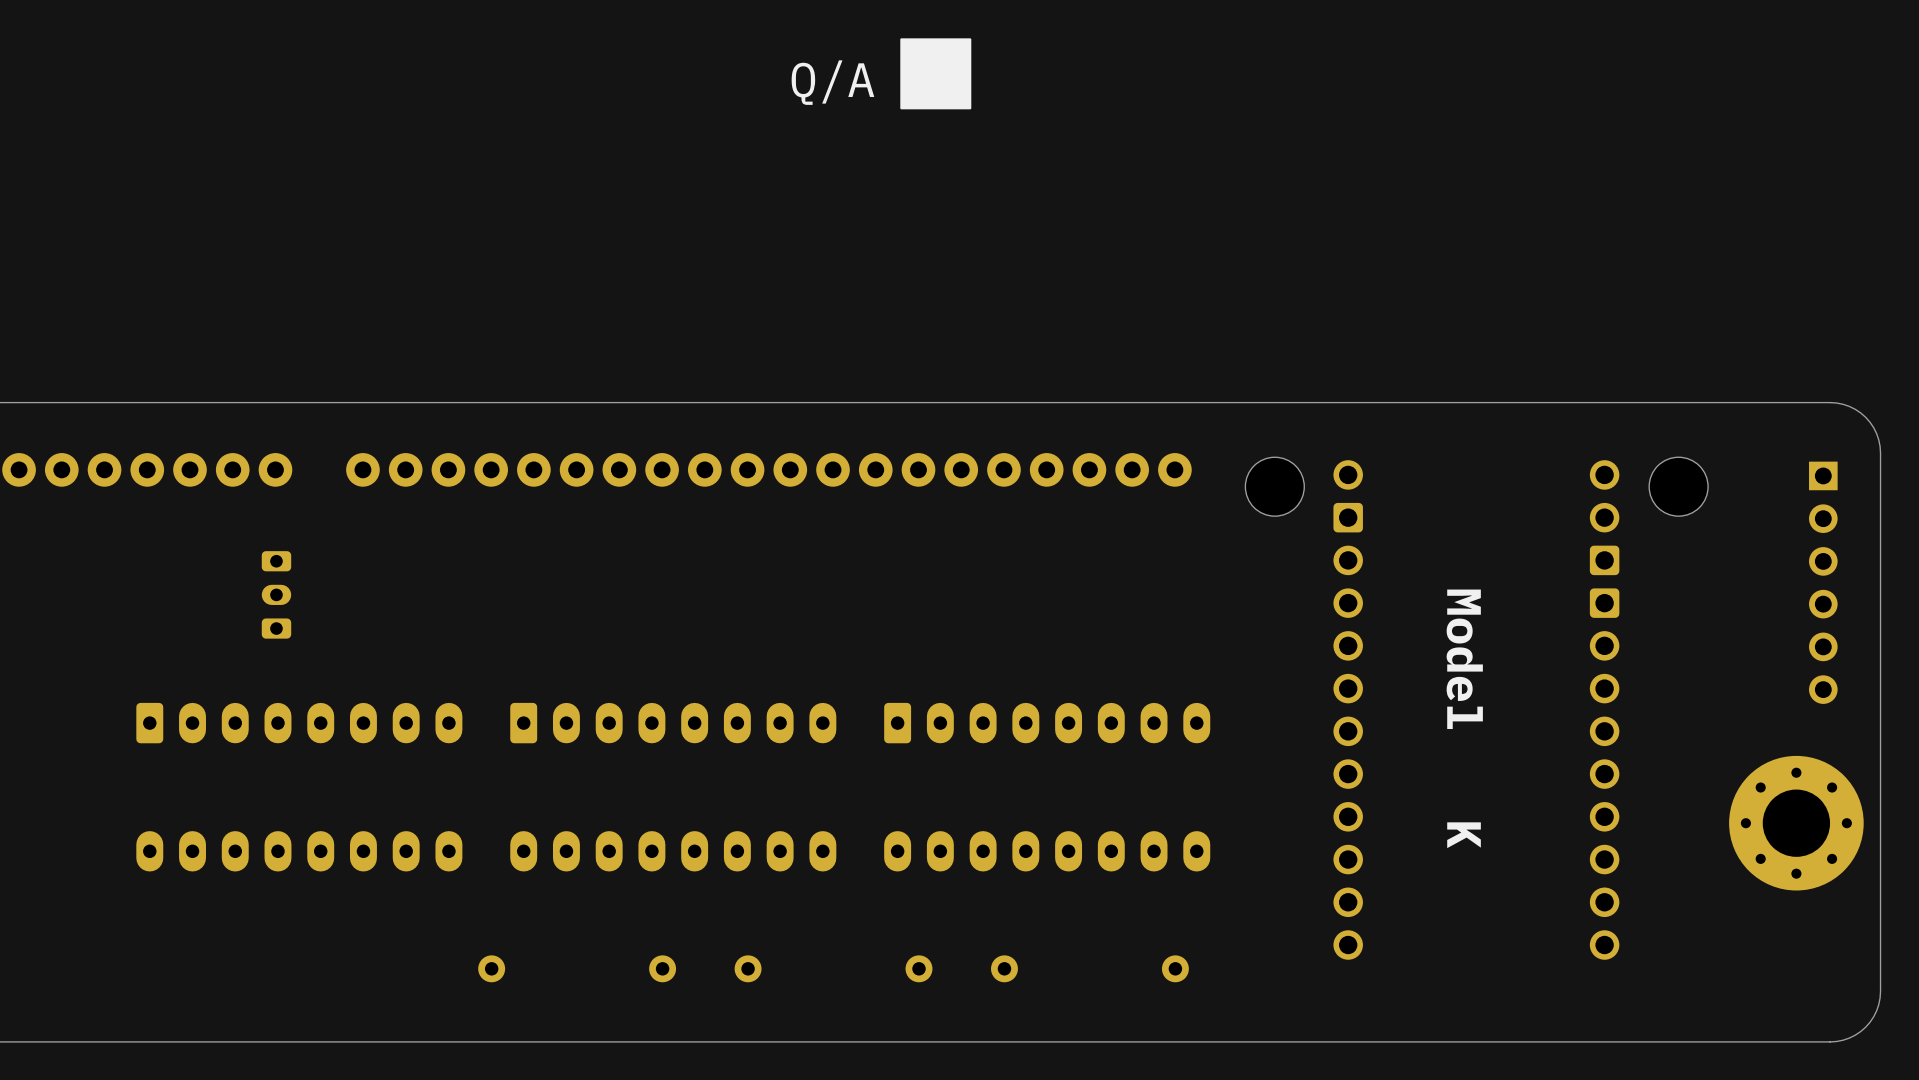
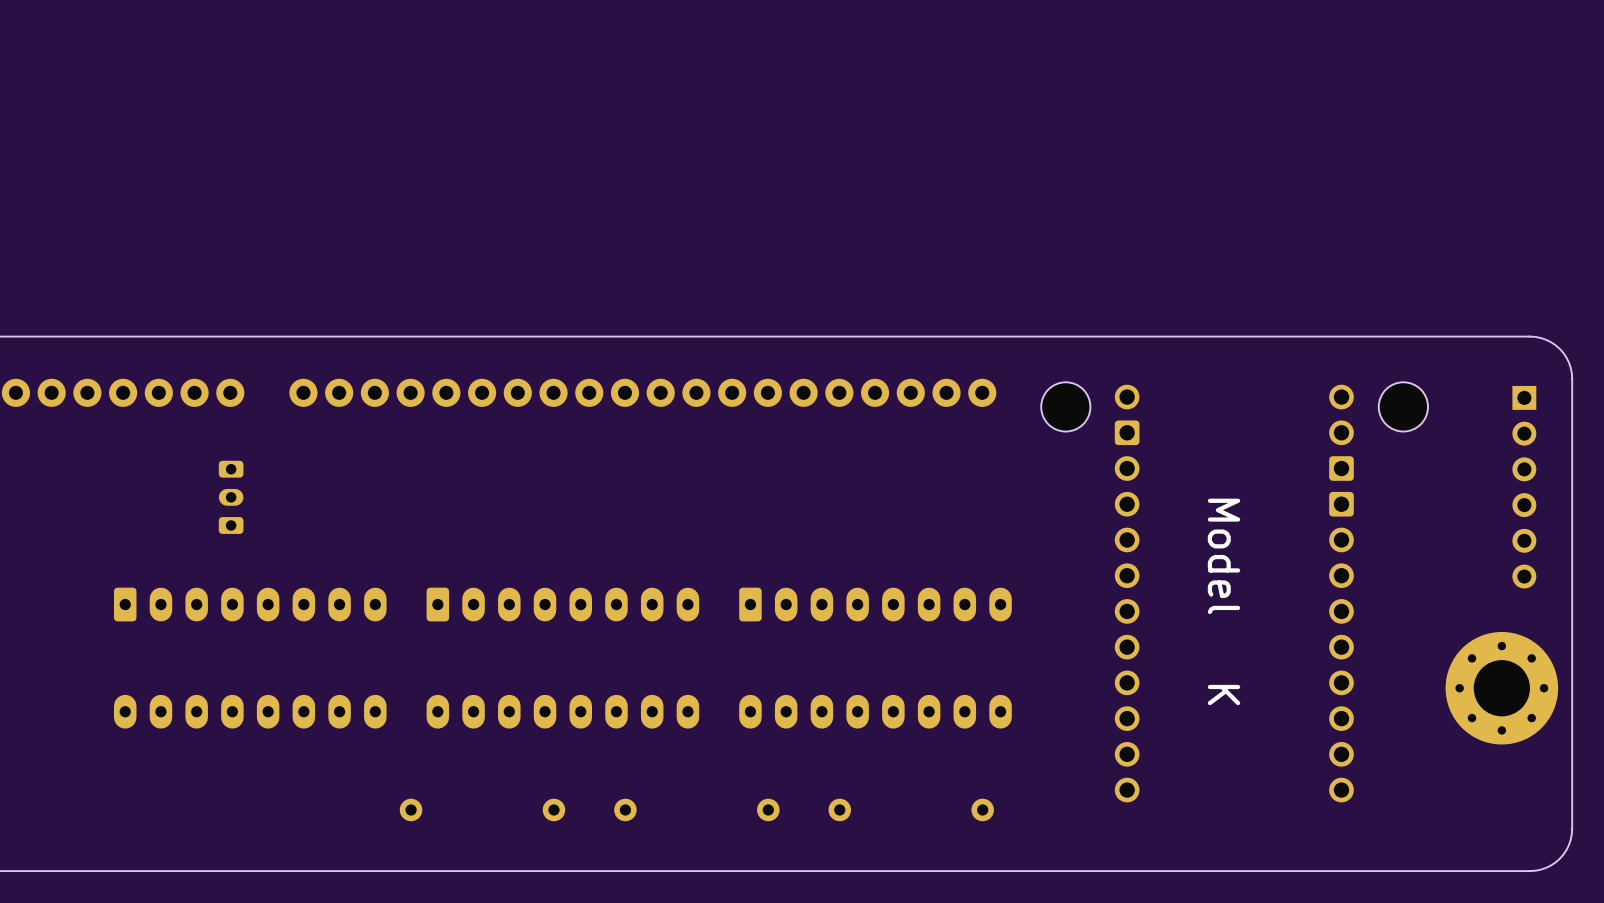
drawing: [900, 38, 972, 110] -> none
text: Q/A (832, 82) -> none

